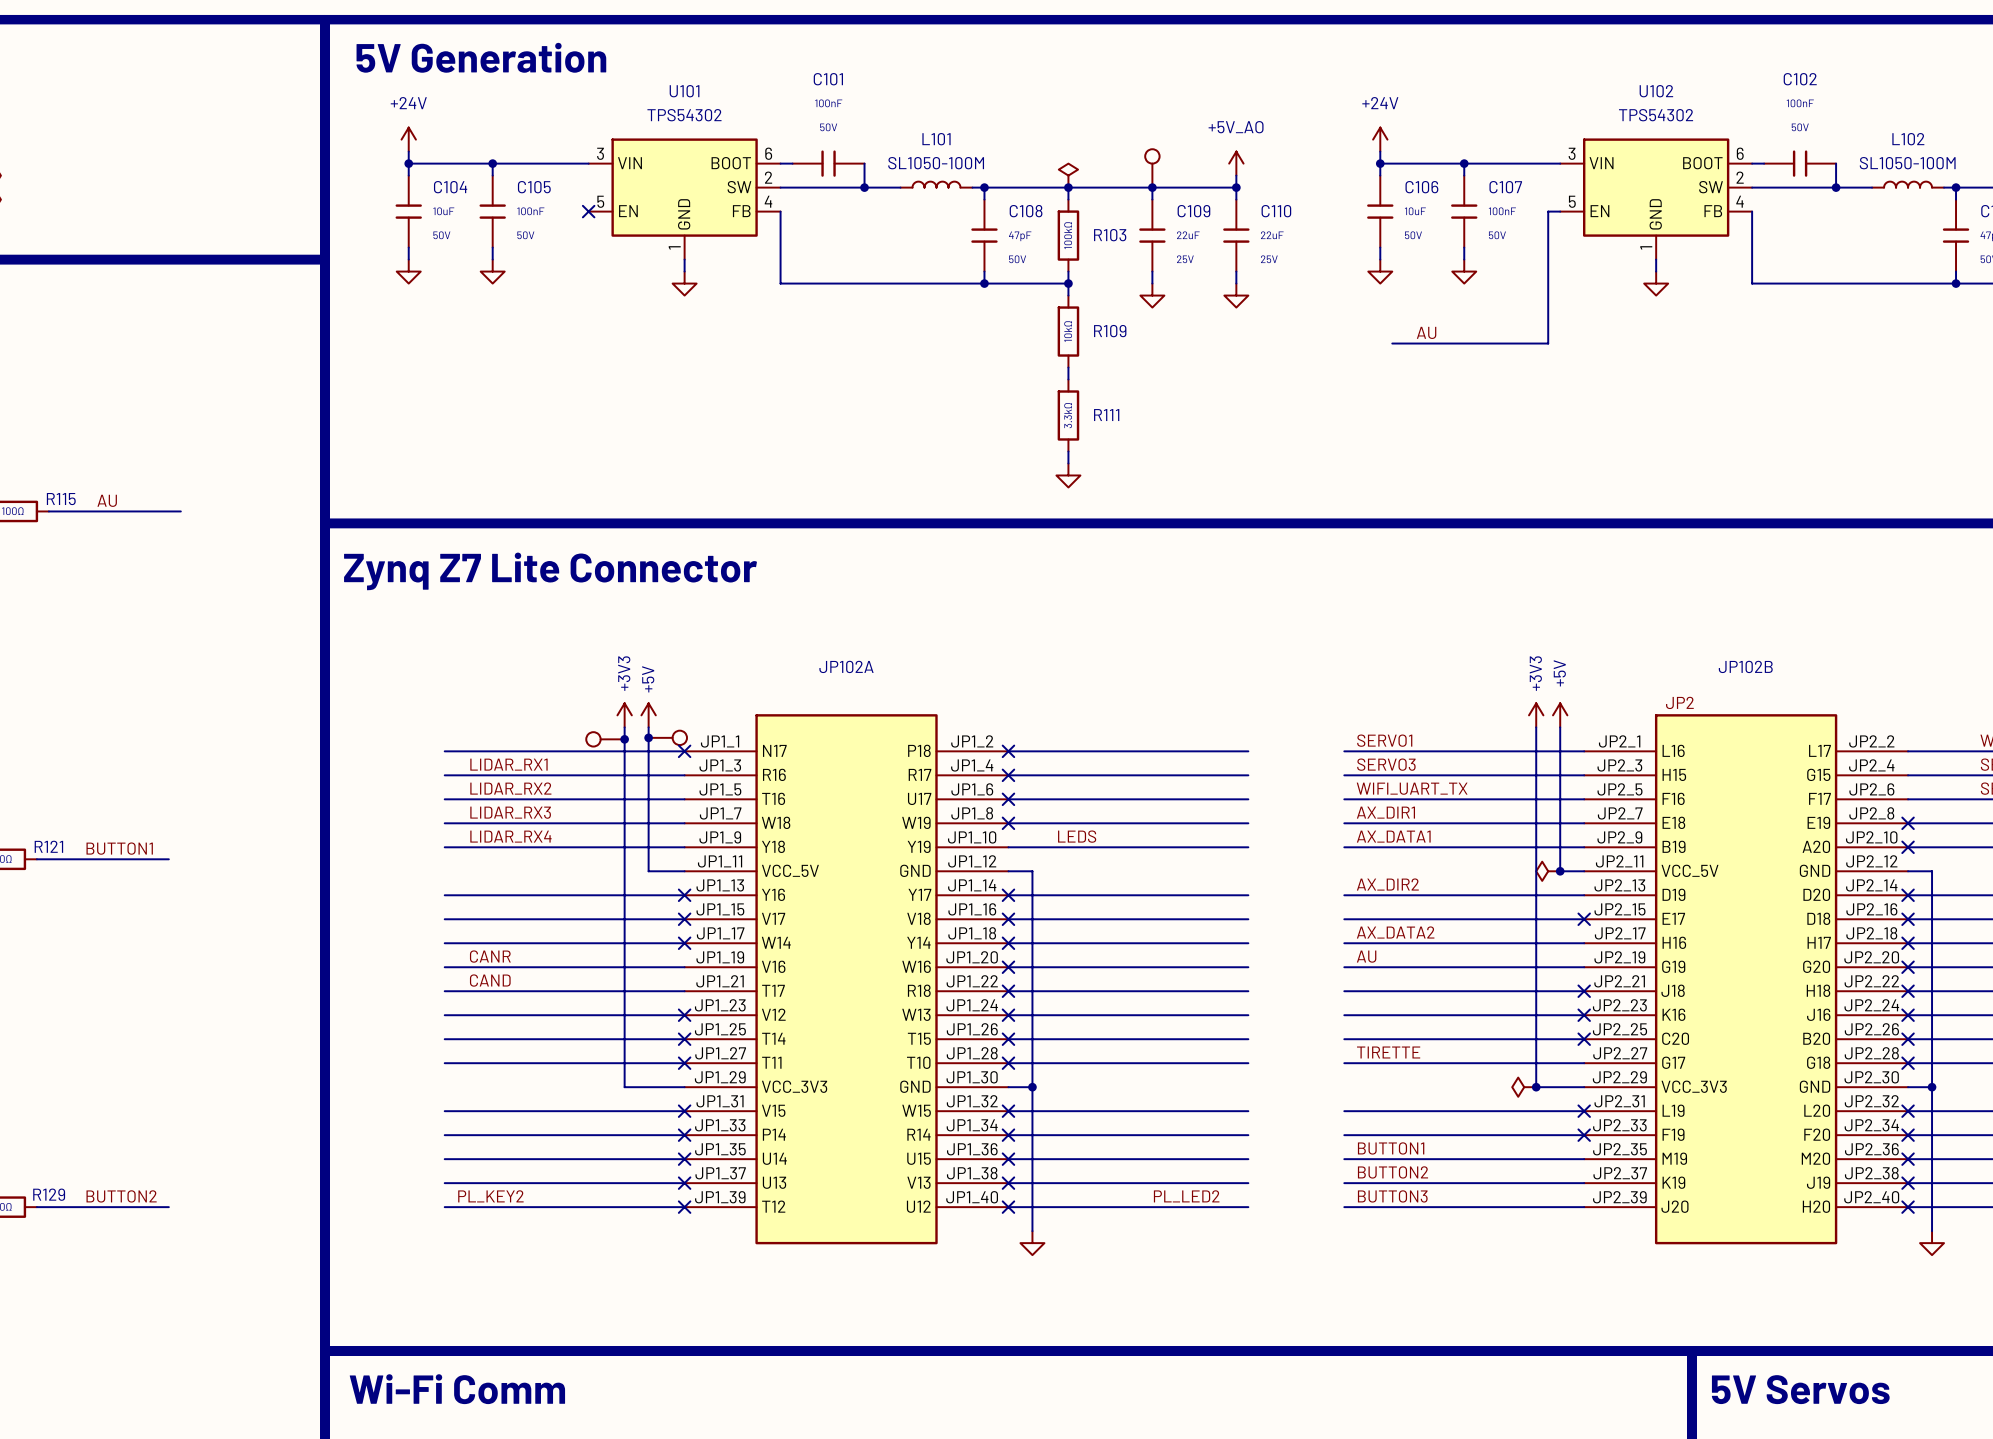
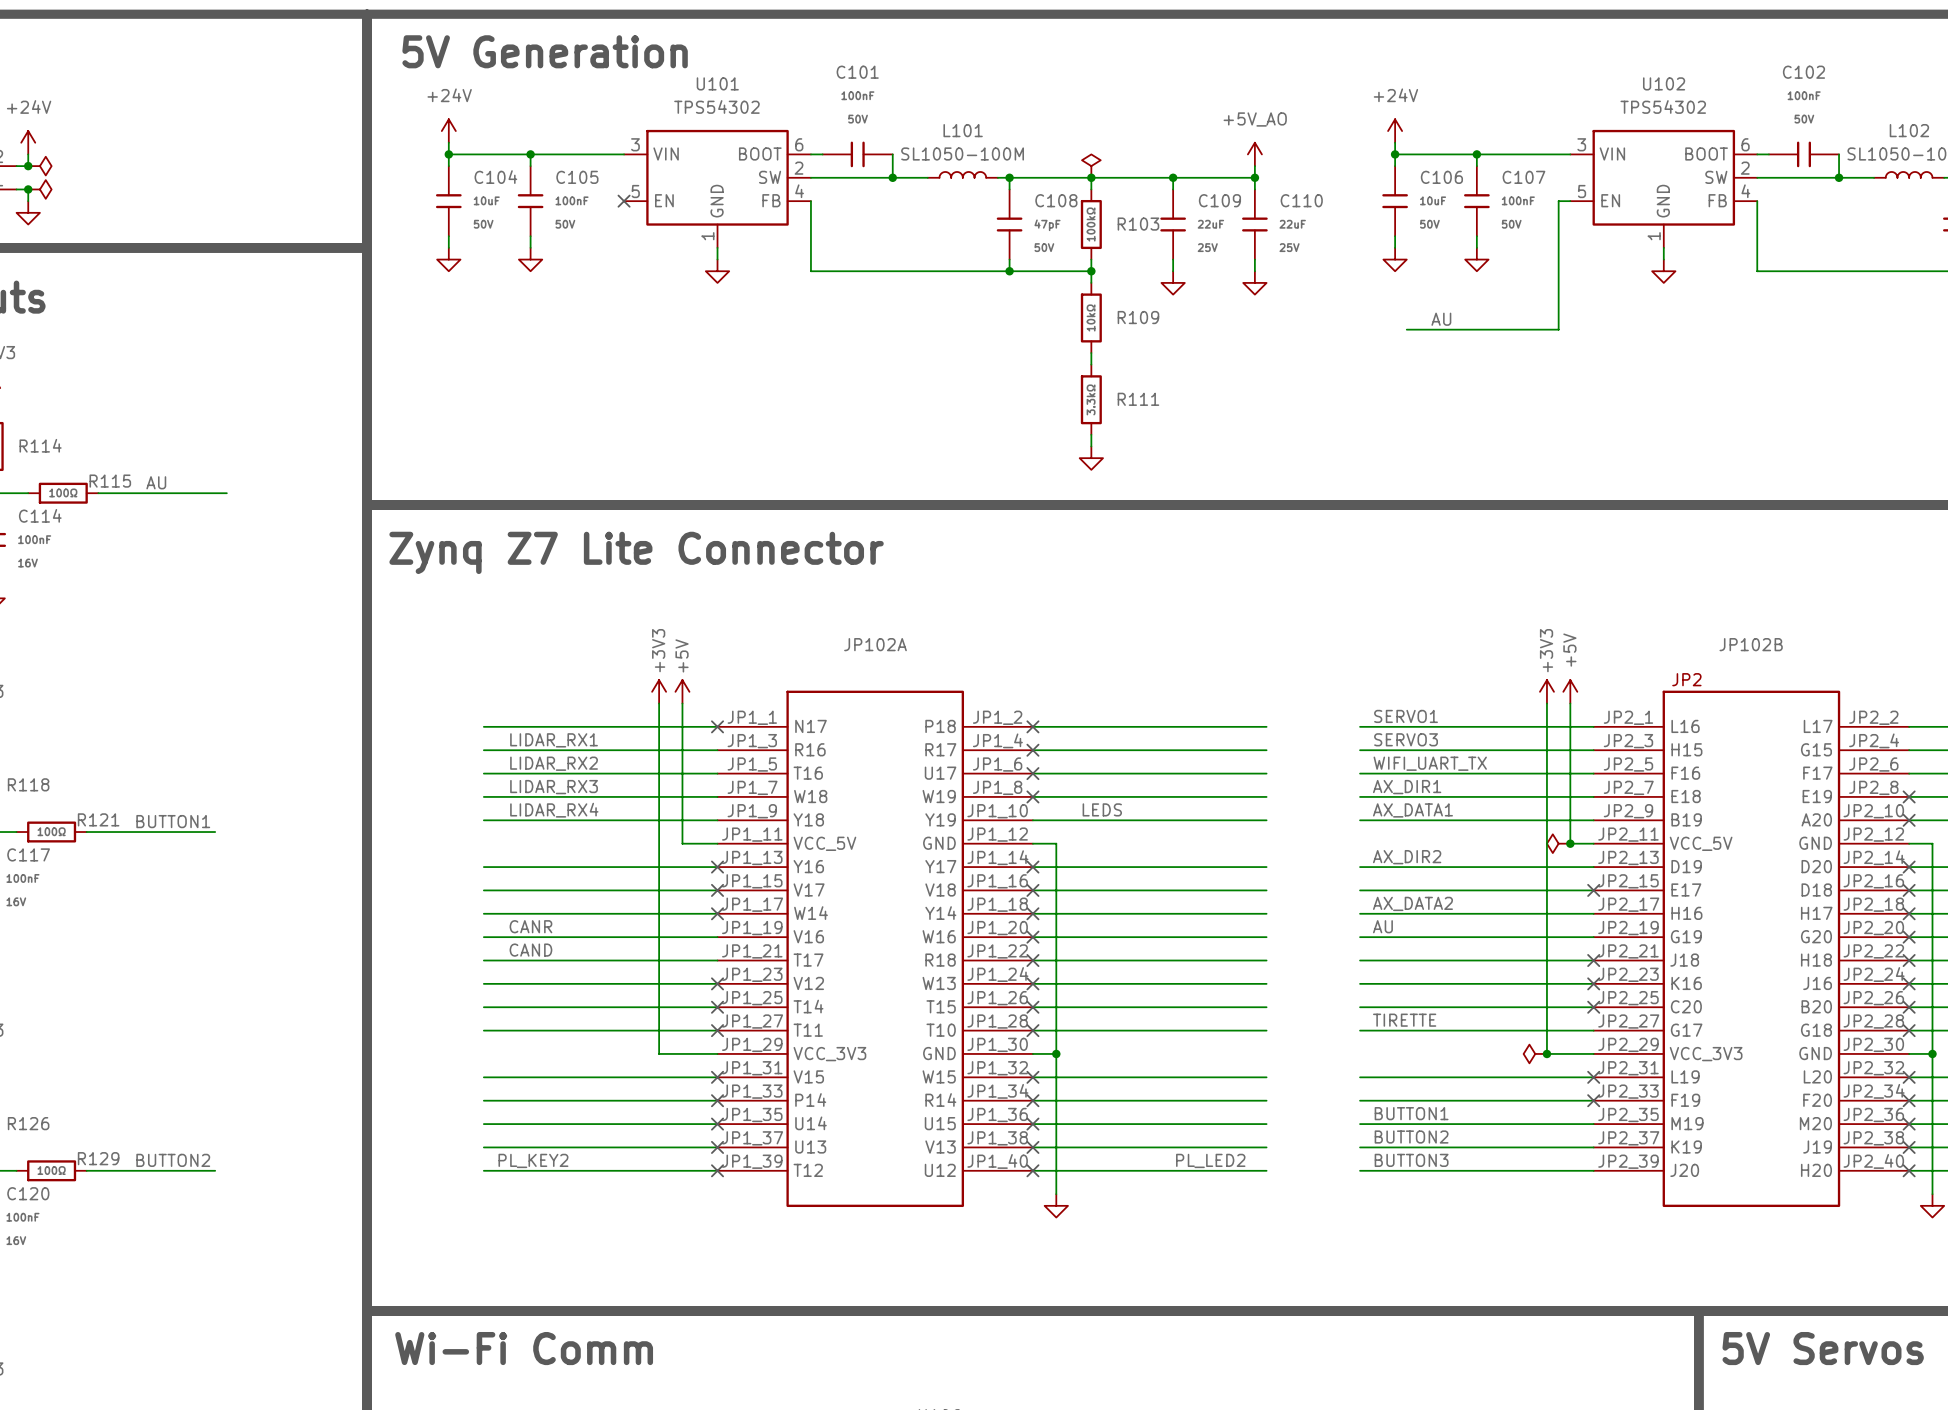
part: (1152, 168) -> none
junction: (648, 737) -> none
part: (667, 737) -> none
part: (605, 739) -> none
junction: (624, 739) -> none

